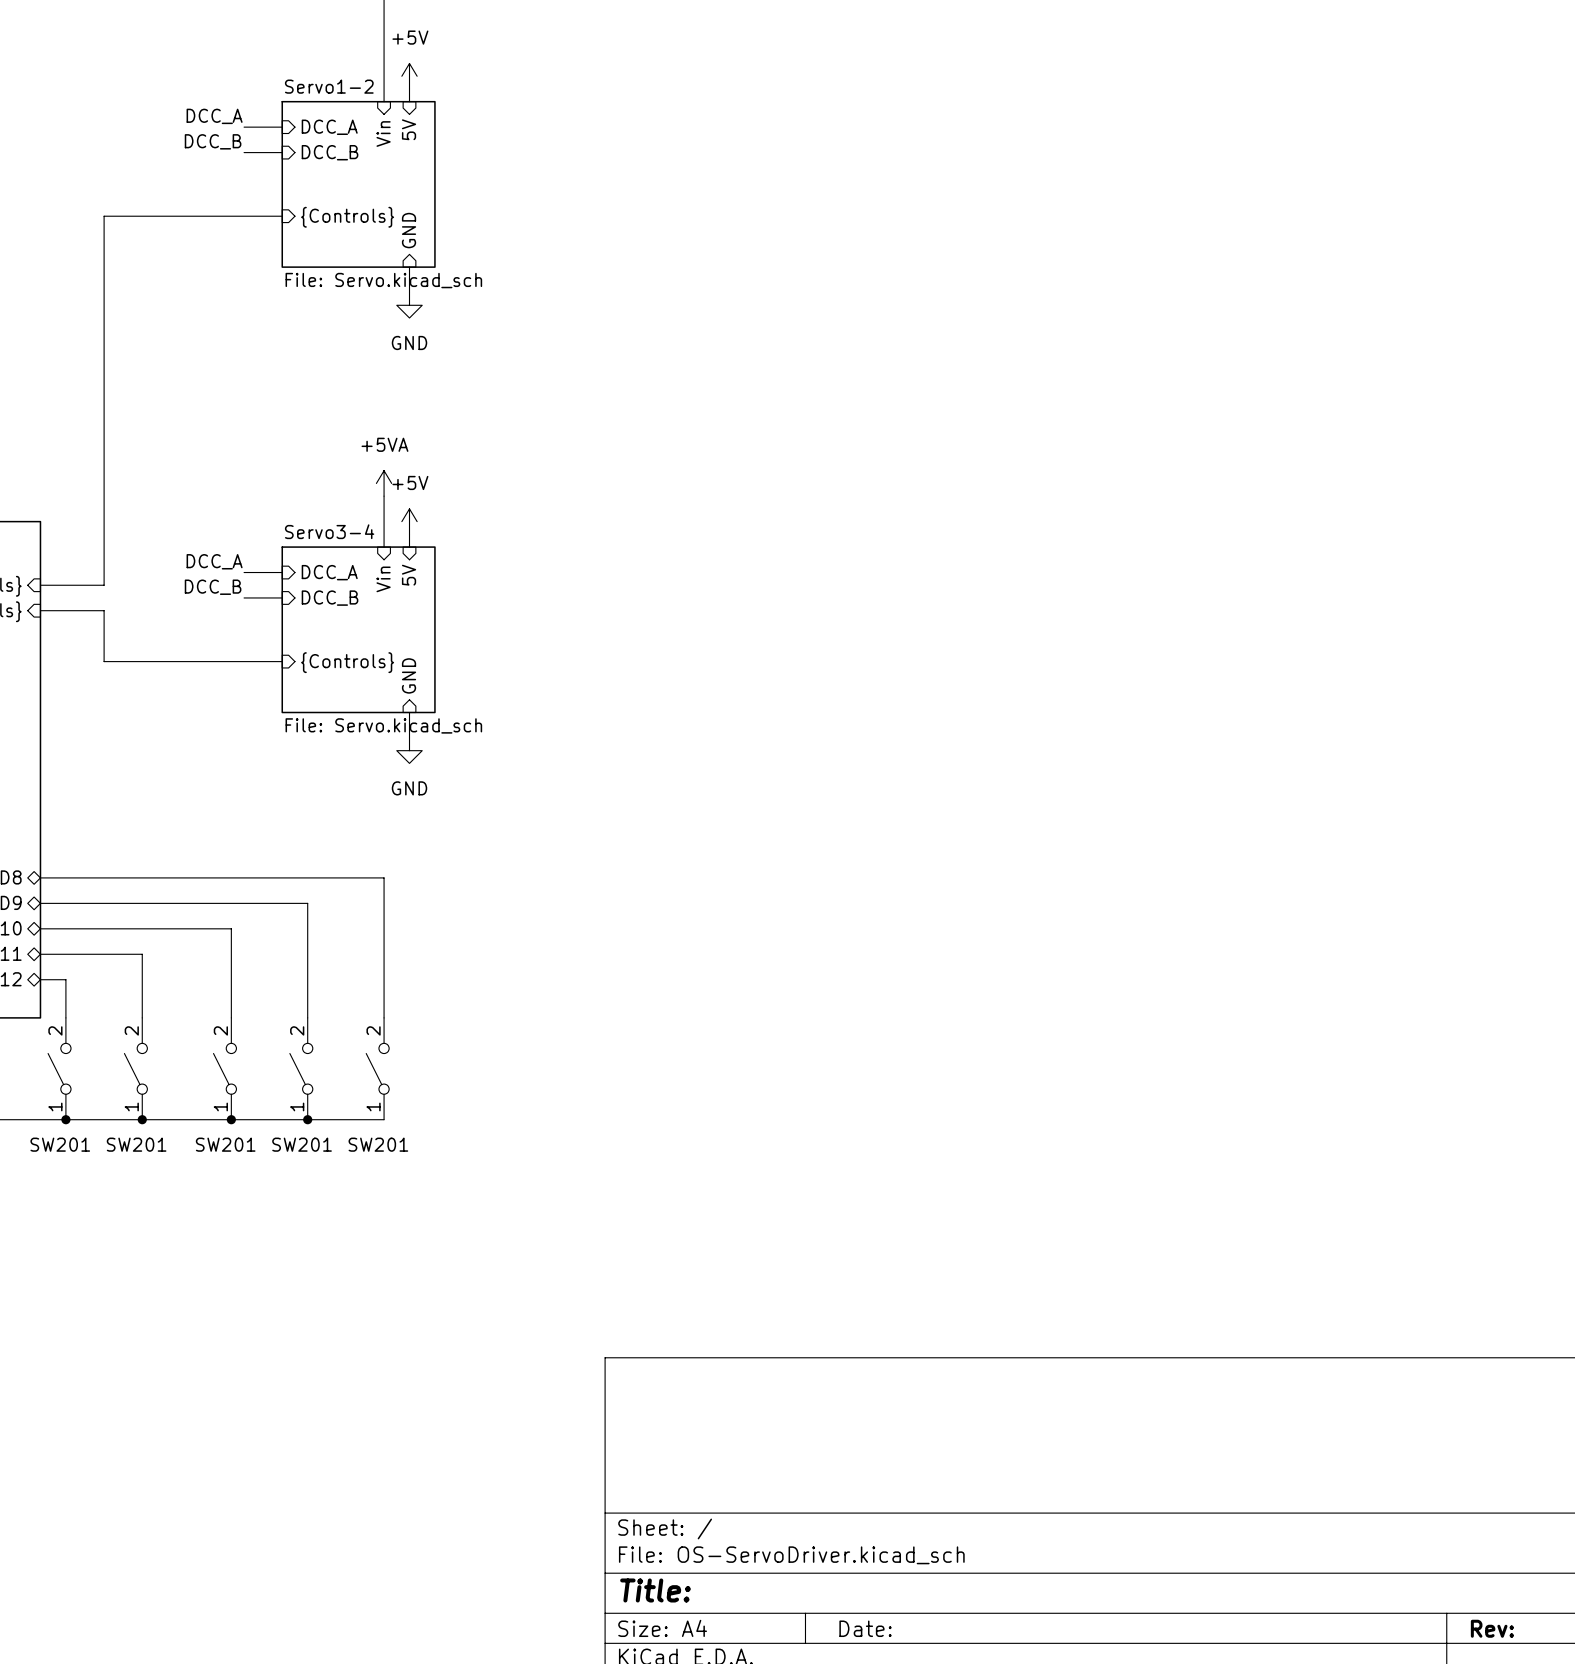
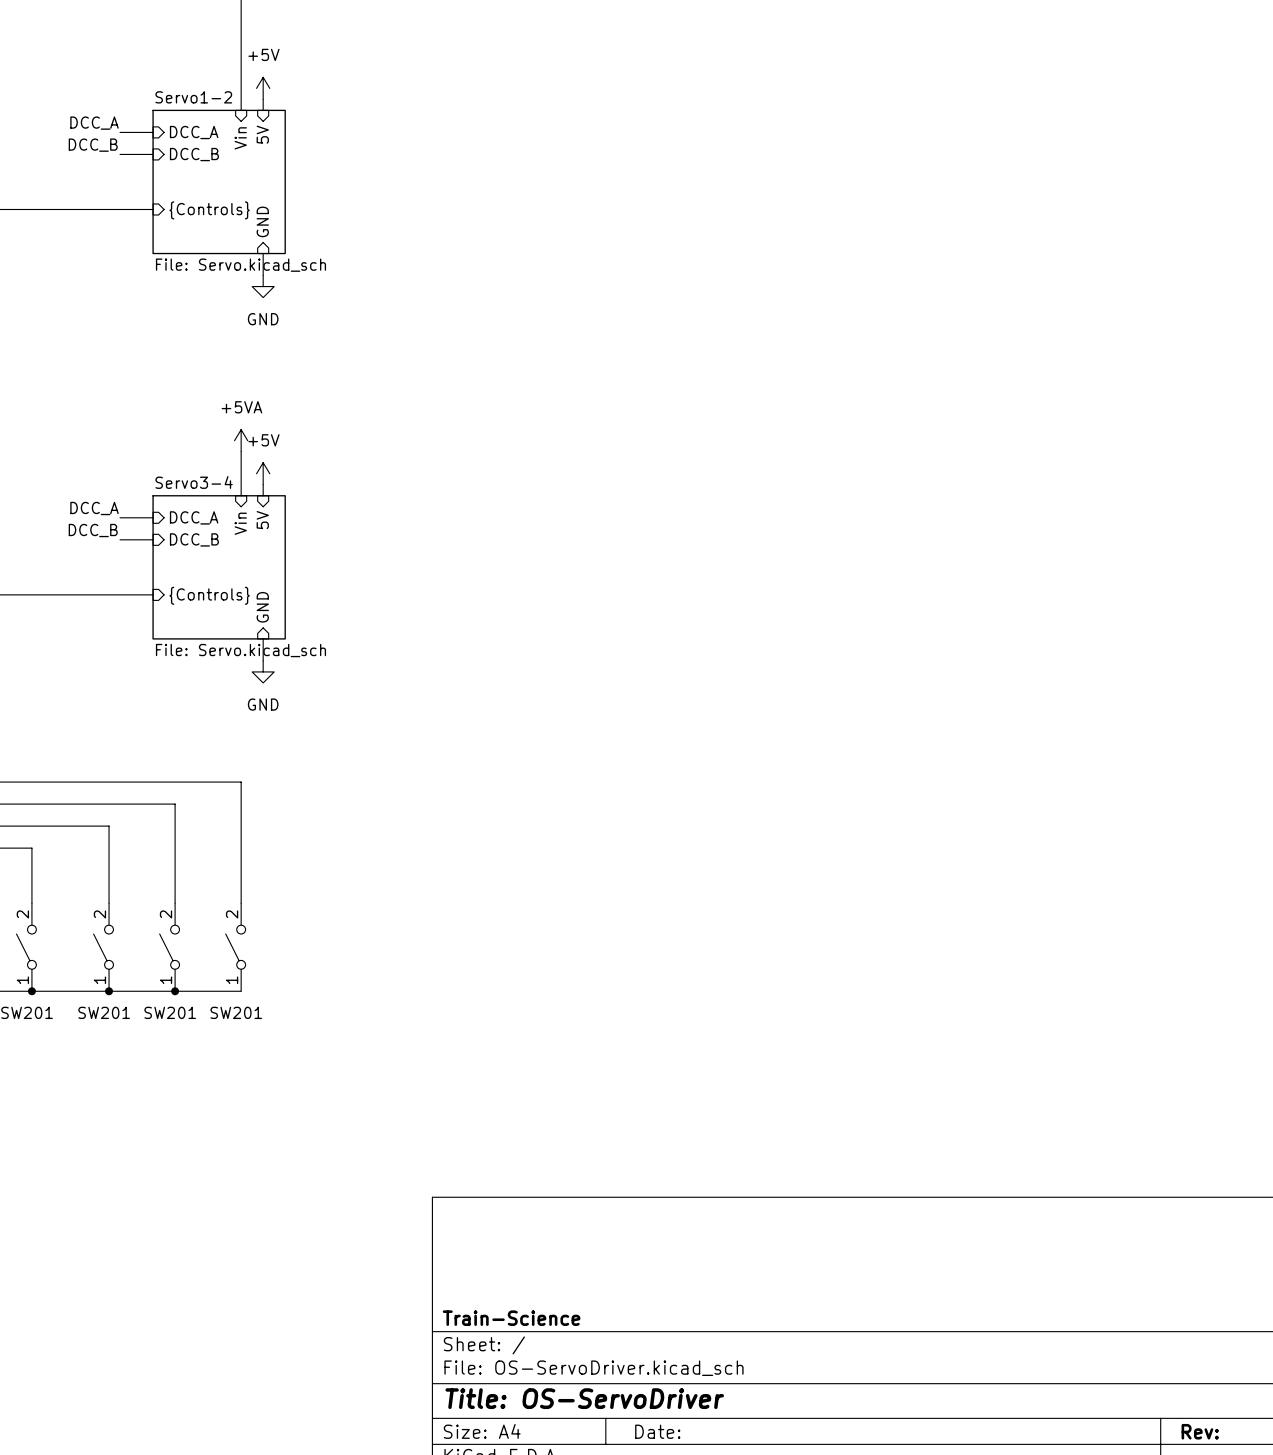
title block: none -> Train-Science (511, 1318)
title block: Title: (655, 1590) -> Title: OS-ServoDriver (584, 1398)

